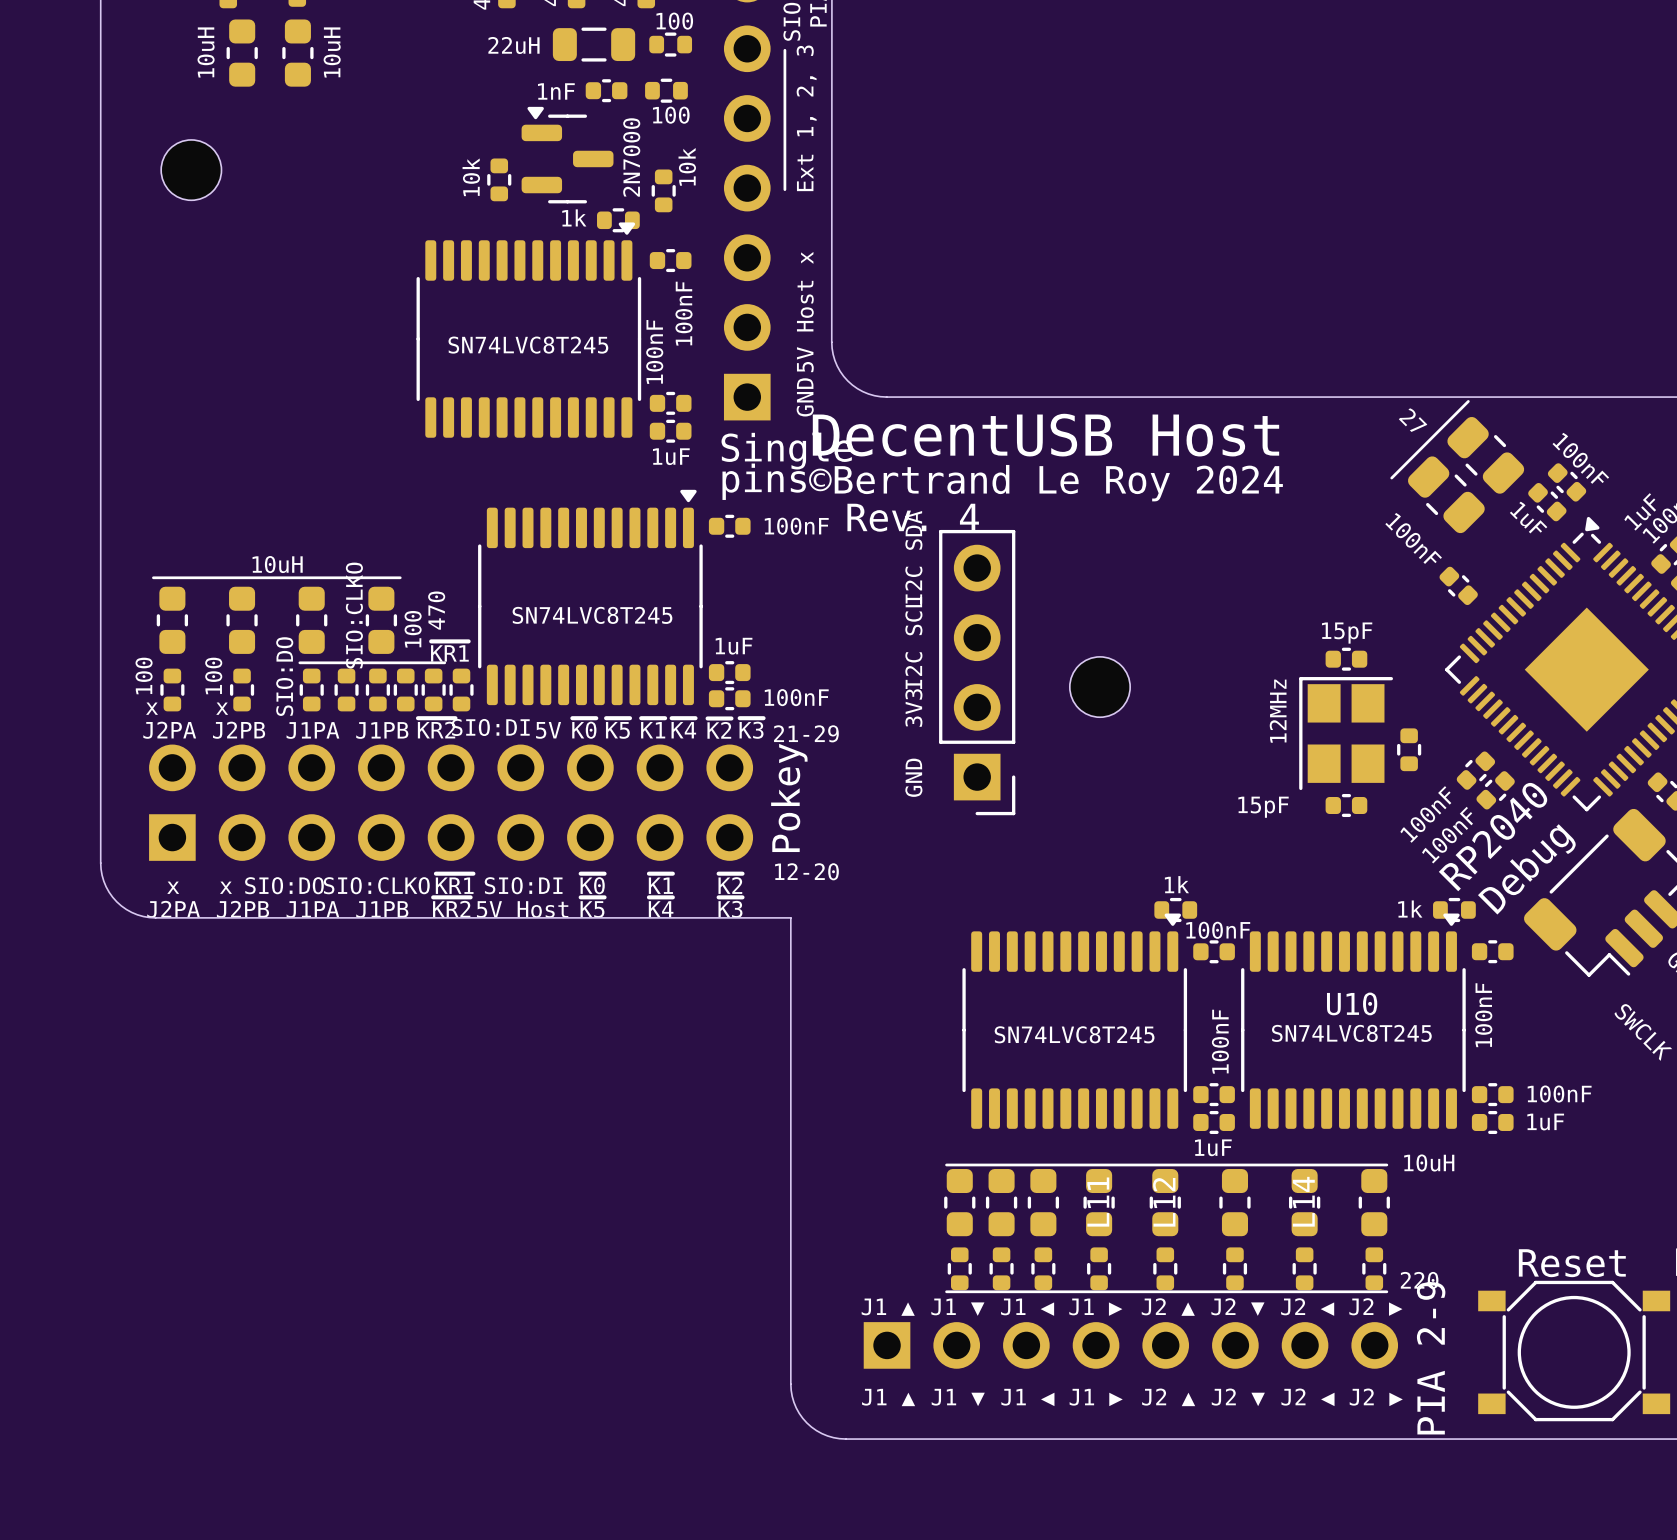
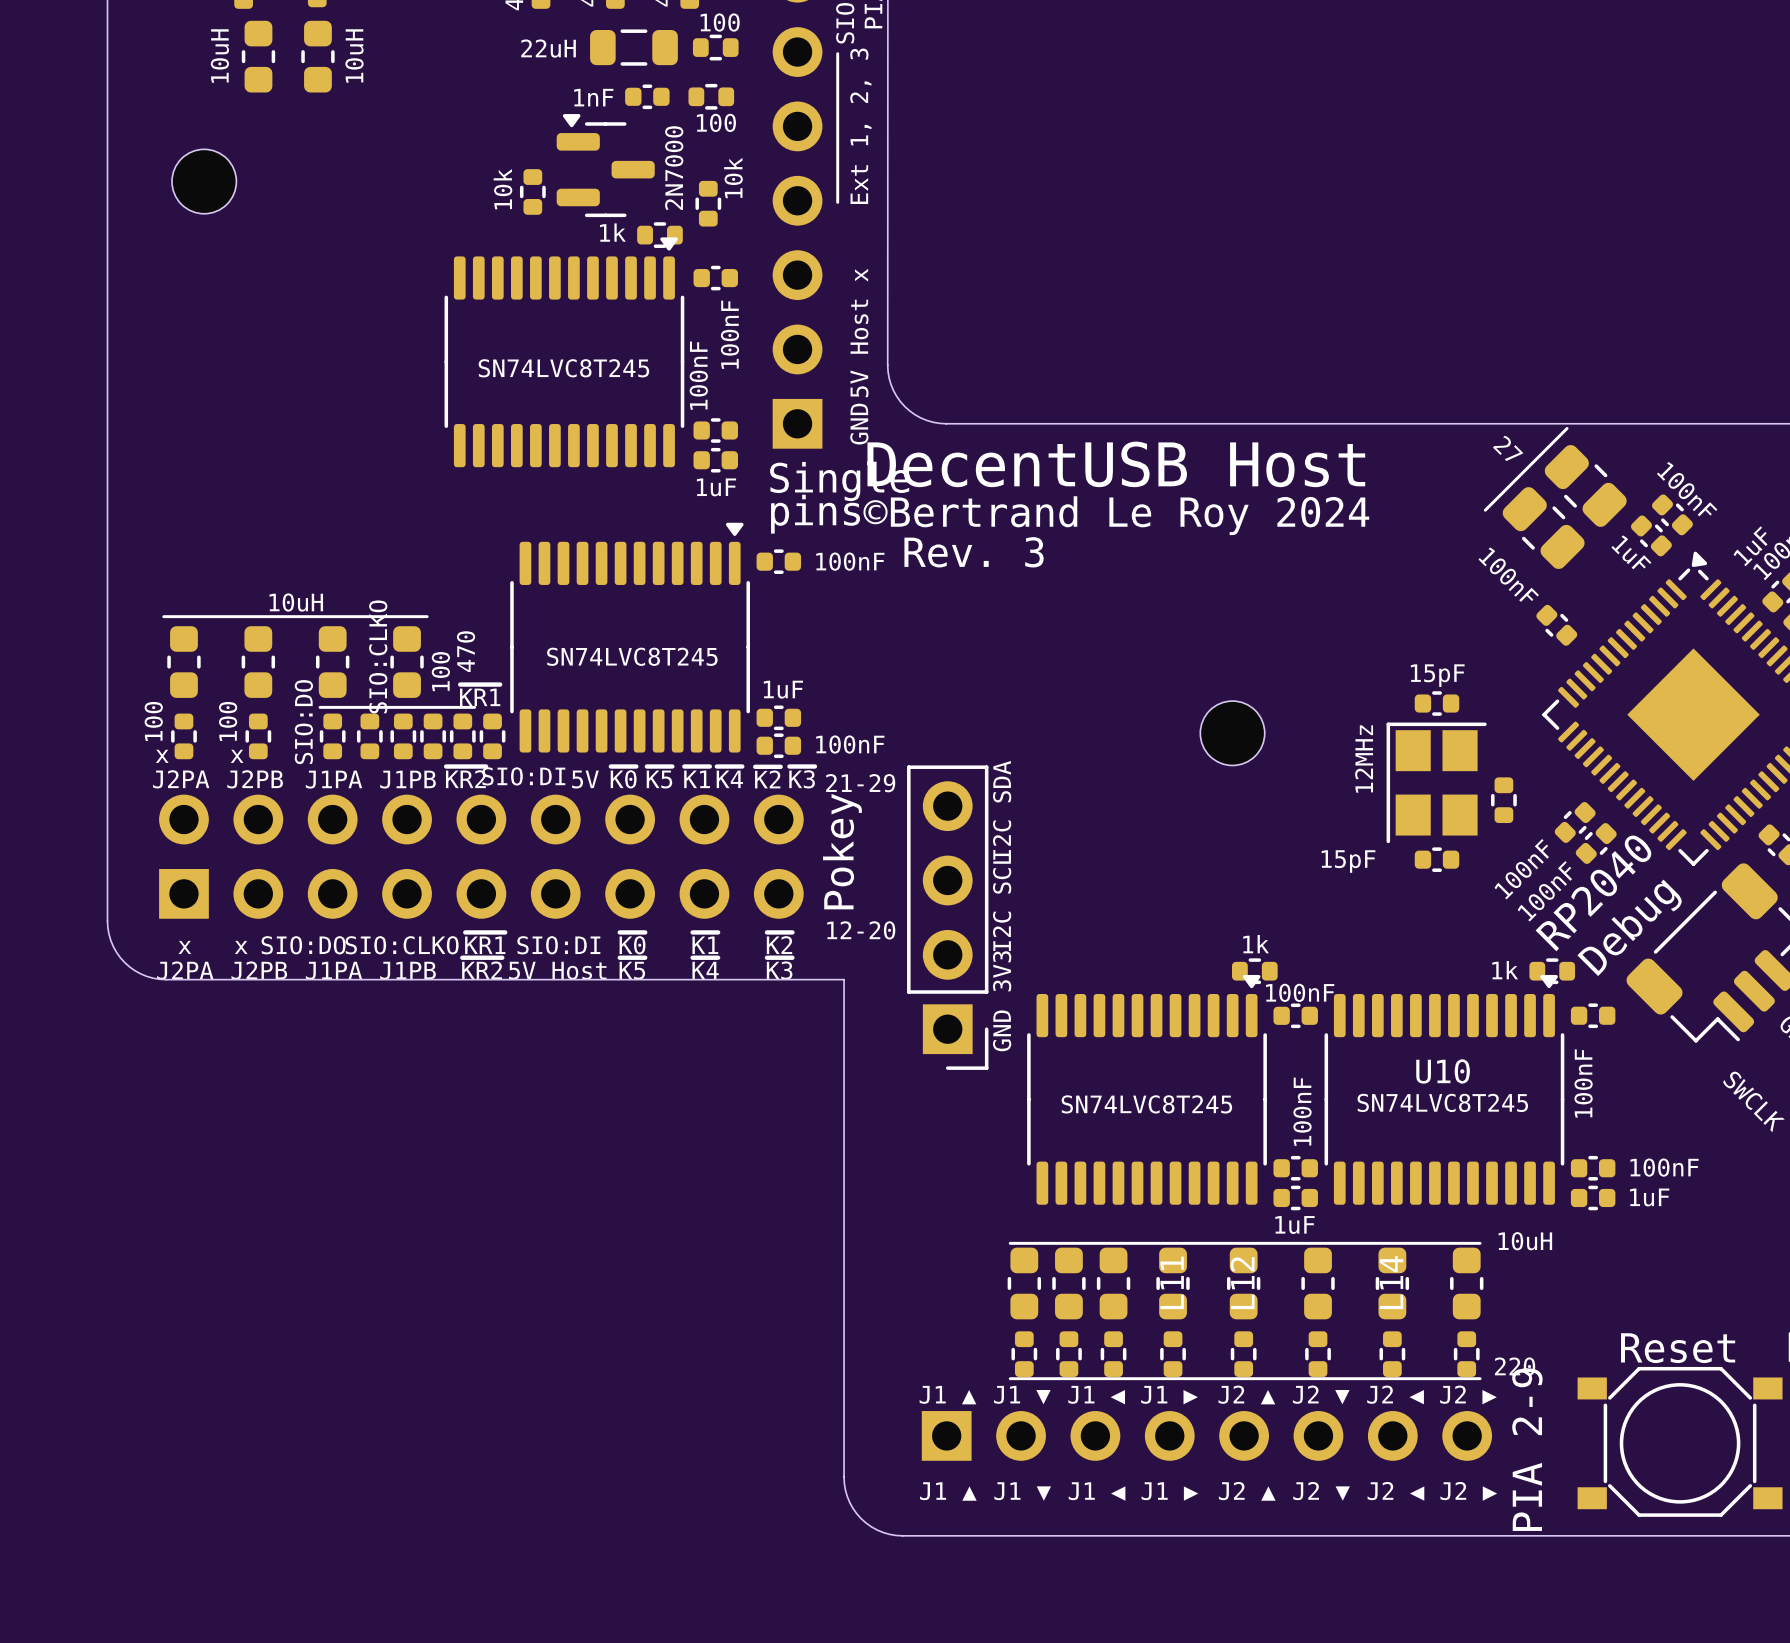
text: Rev. 4 (913, 517) -> Rev. 3 (974, 552)
text position: I2C SDA (913, 557) -> I2C SDA (1002, 810)
text position: I2C SCL (913, 643) -> I2C SCL (1002, 901)
part position: (977, 672) -> (947, 917)
part position: (1099, 687) -> (1232, 733)
text position: 3V3 (913, 708) -> 3V3 (1002, 971)
text position: GND (913, 777) -> GND (1002, 1030)

